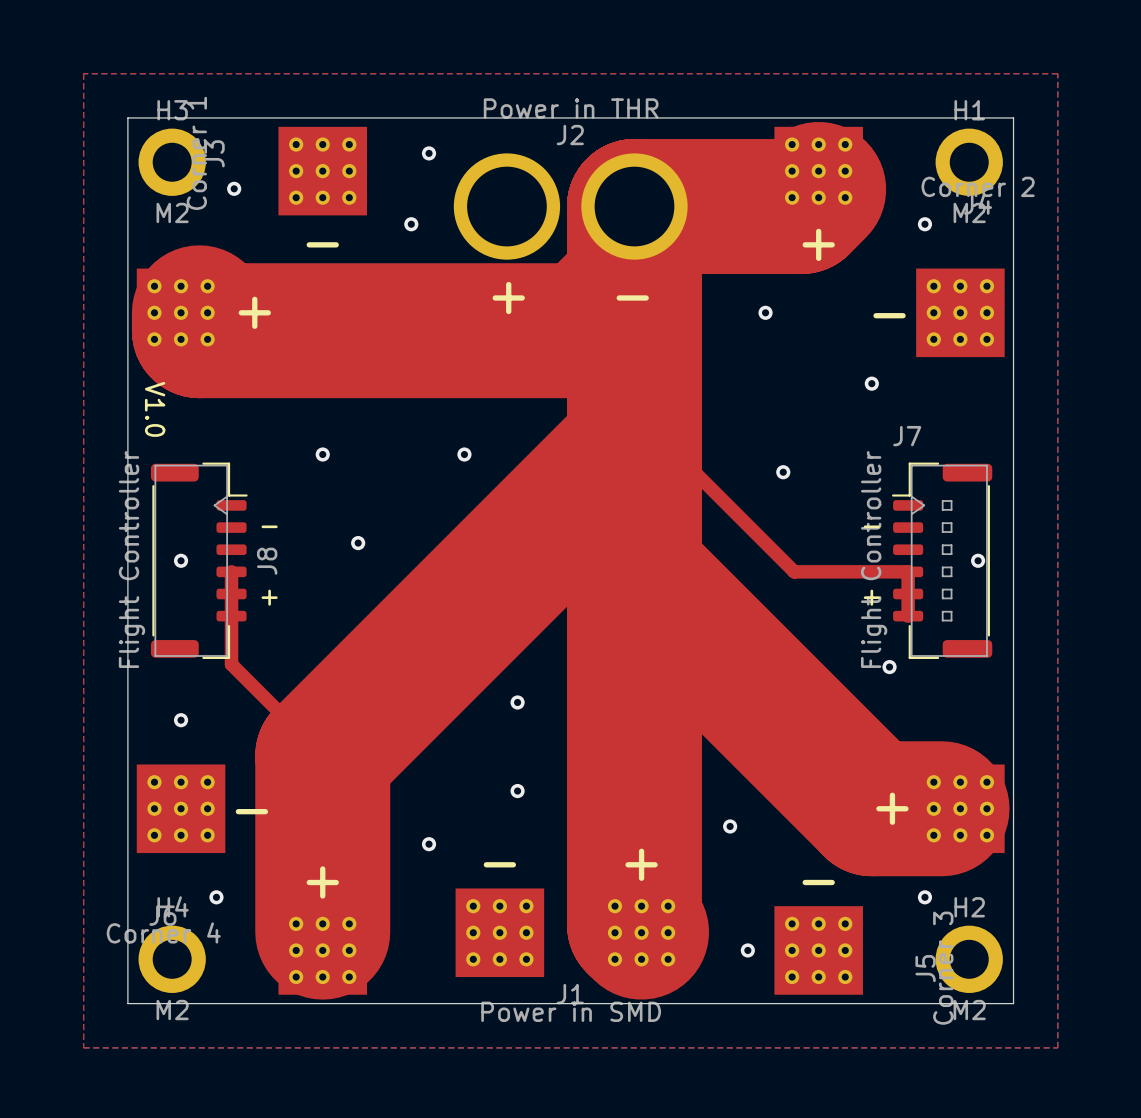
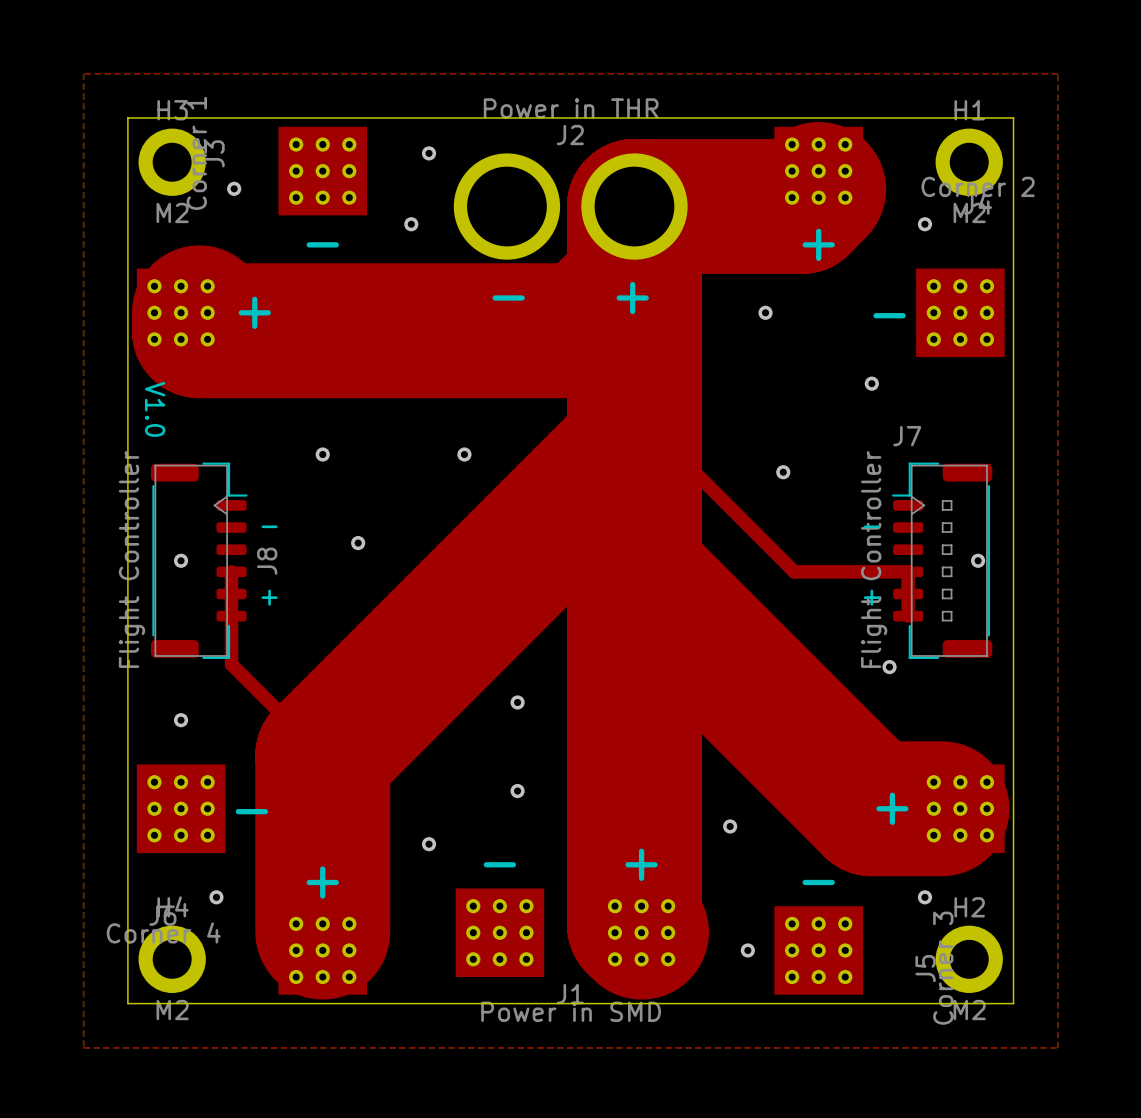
J2 text: + (508, 297) -> - (508, 297)
J2 text: - (632, 297) -> + (632, 297)

